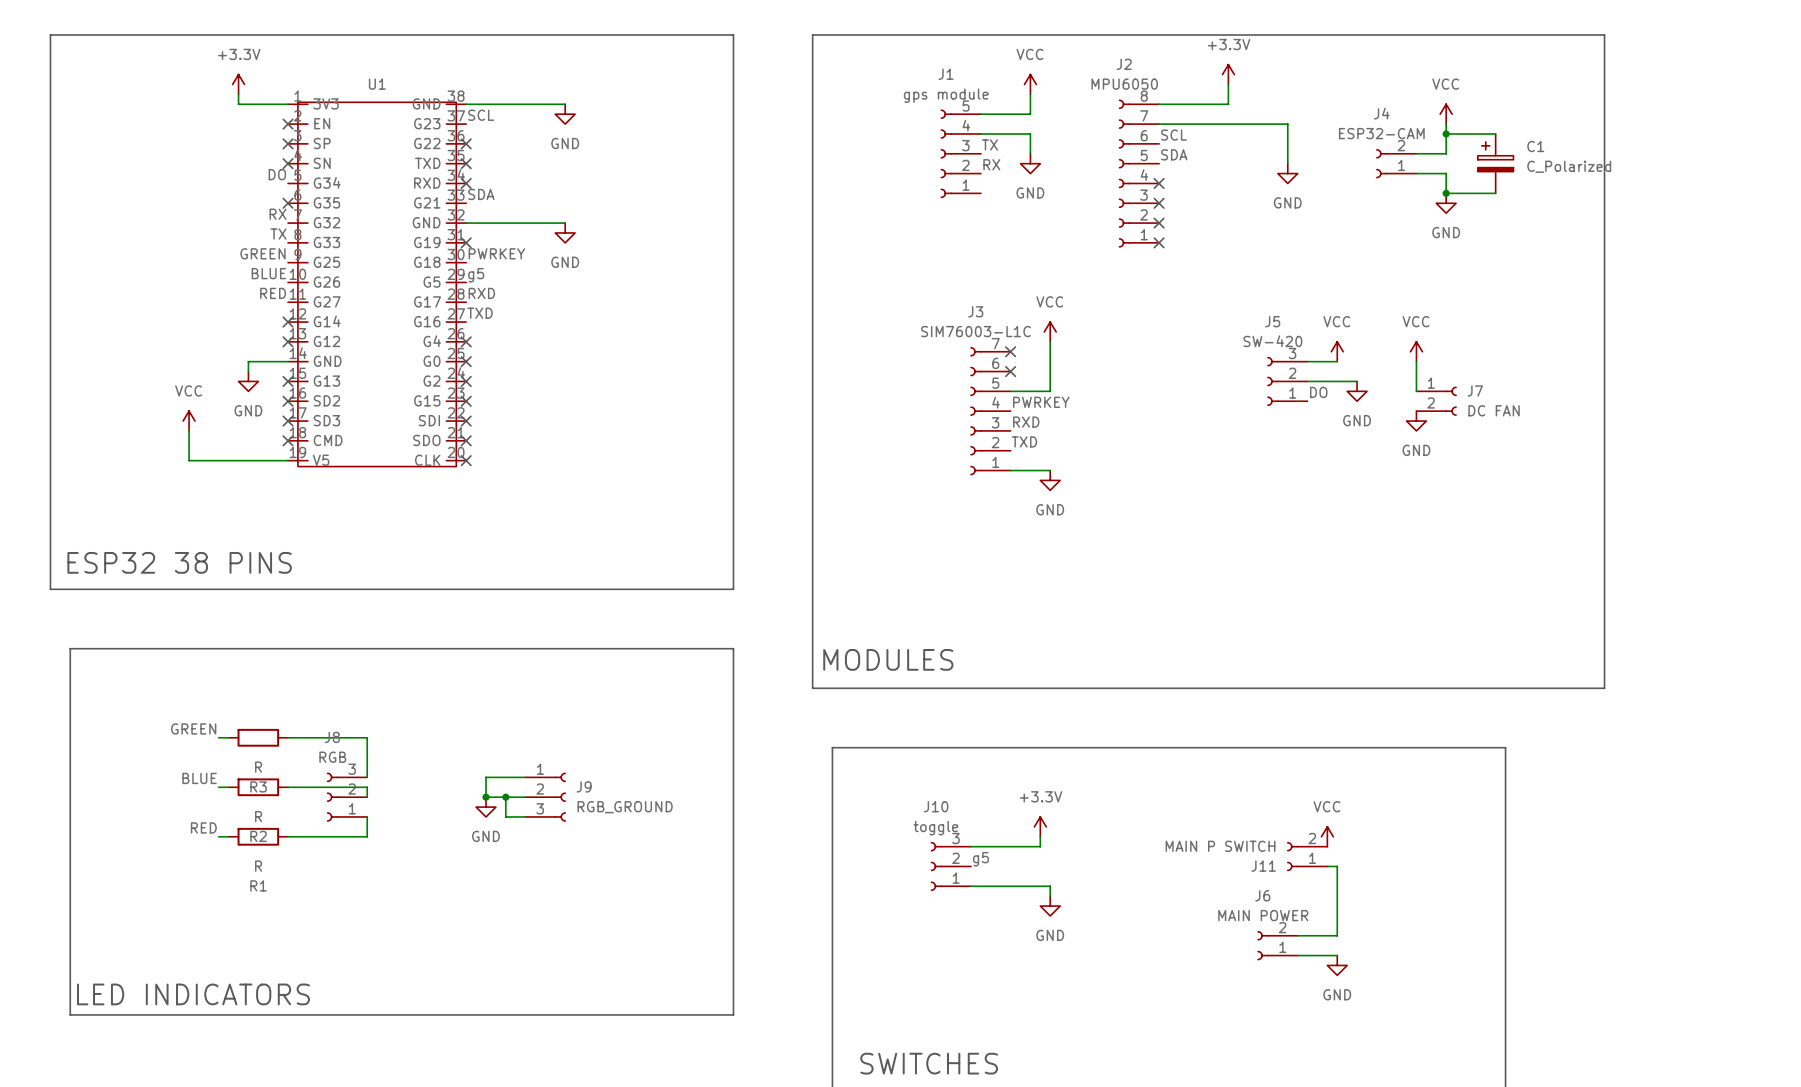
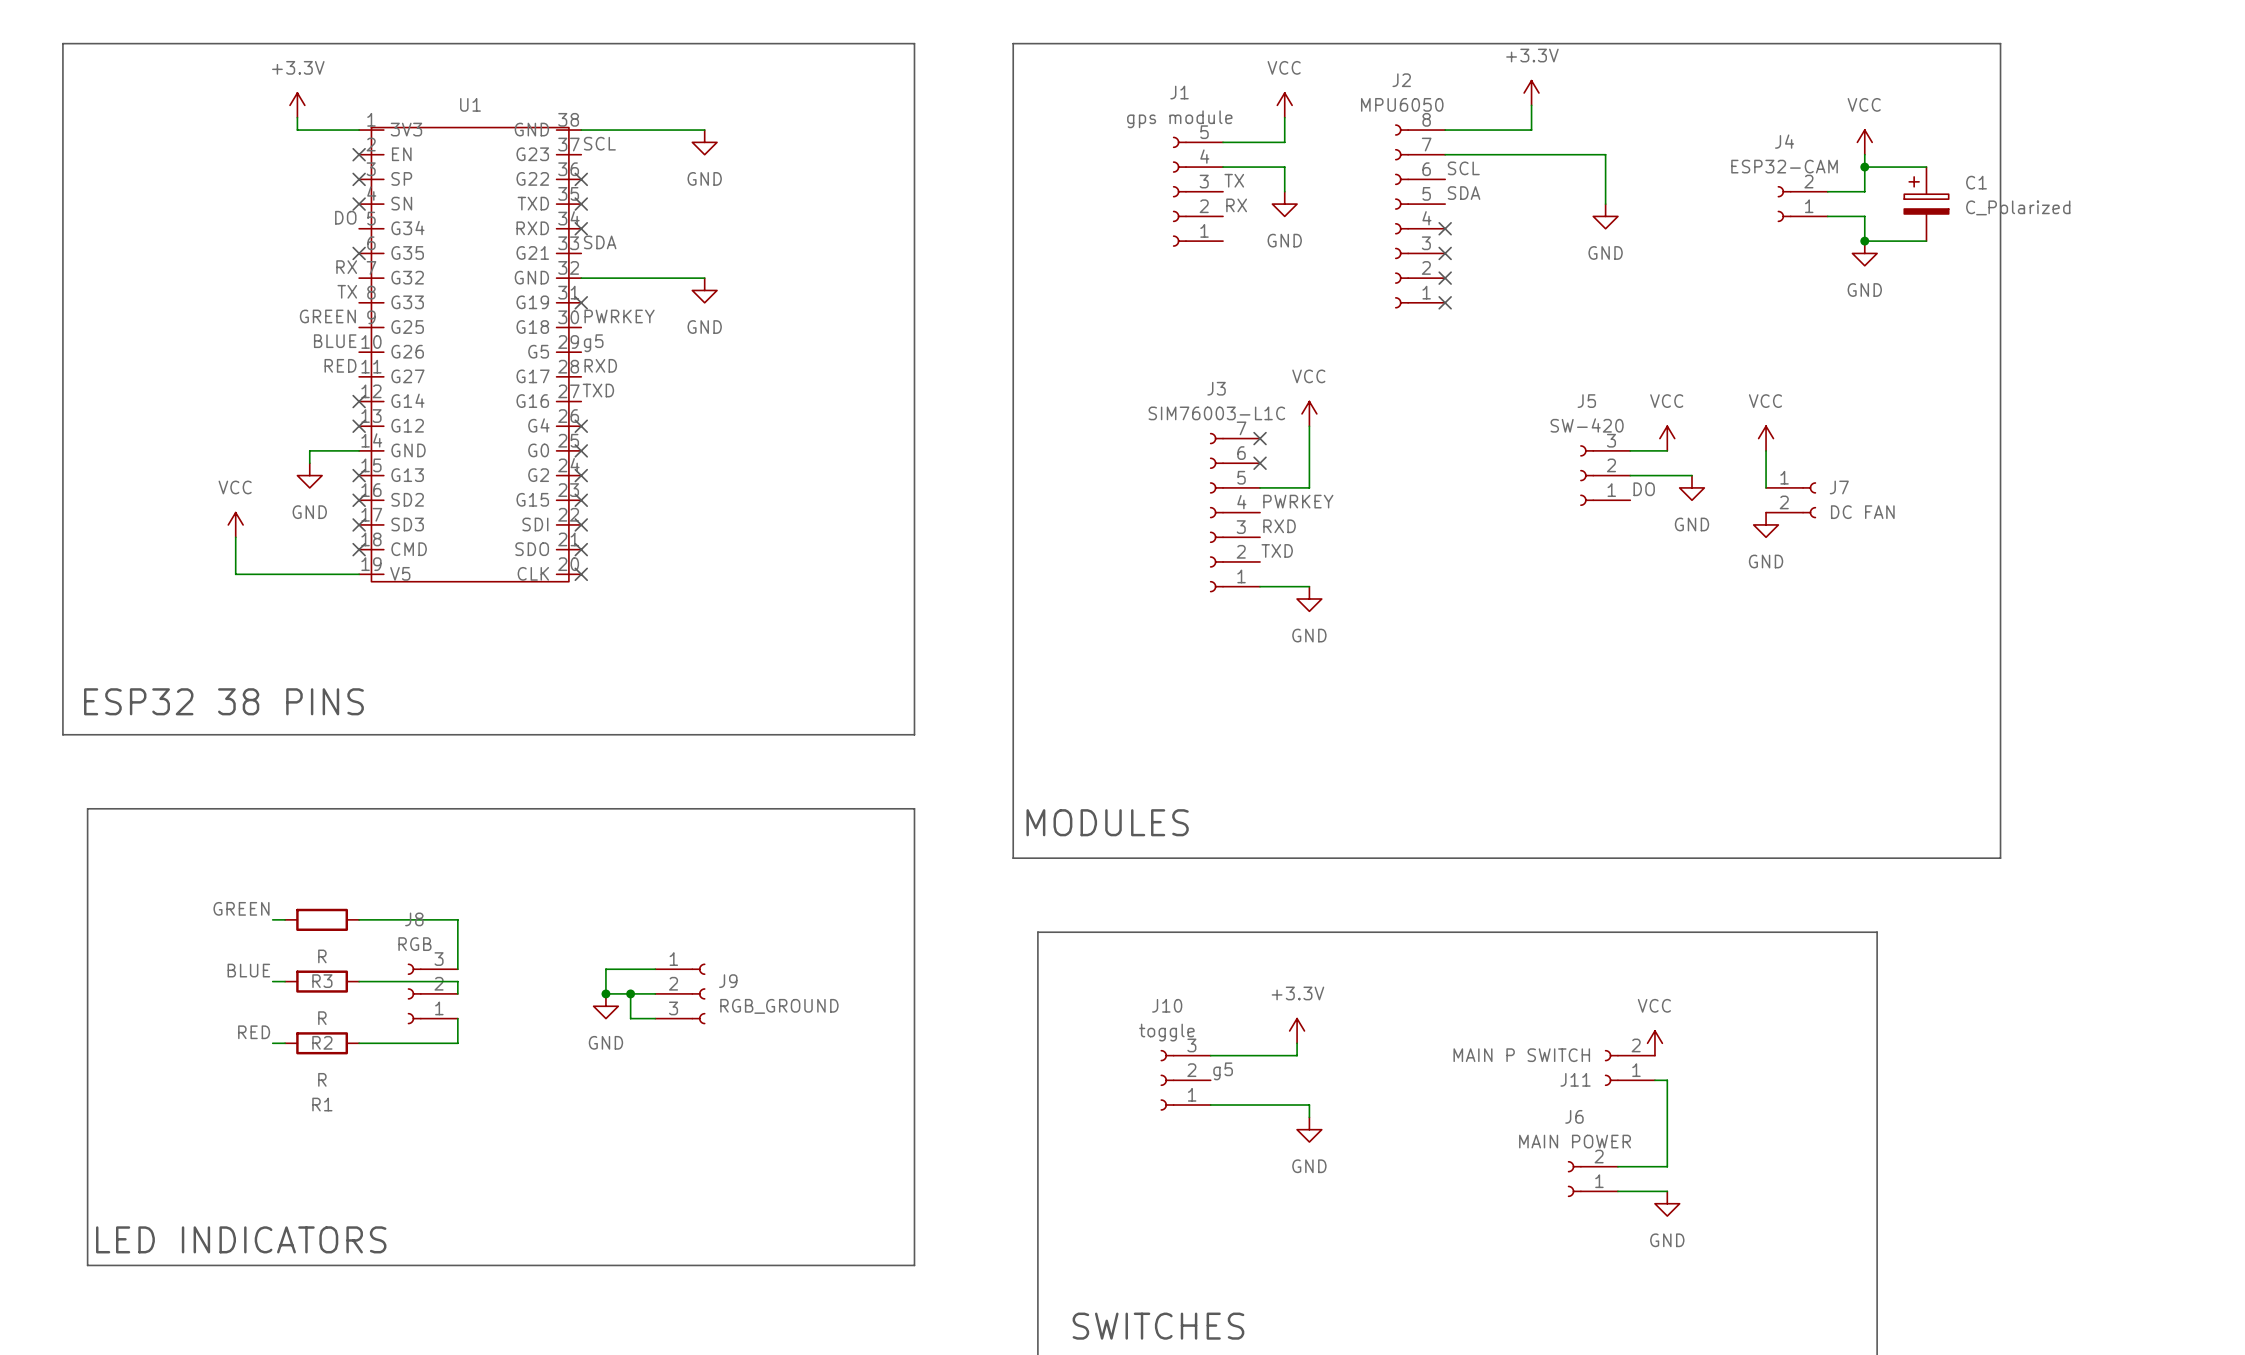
power symbol position: VCC (1446, 114) -> VCC (1864, 142)
wire: (1446, 124) (1446, 153) (1416, 153) -> (1864, 154) (1864, 191) (1827, 191)
wire: (1446, 133) (1495, 133) -> (1926, 167) (1864, 167)
junction: (1446, 133) -> none
junction: none -> (1864, 167)
J4 position: (1396, 163) -> (1802, 204)
C1 position: (1495, 163) -> (1926, 204)
wire: (1416, 173) (1446, 173) (1446, 193) (1495, 193) -> (1827, 216) (1864, 216) (1864, 241) (1926, 241)
junction: (1446, 193) -> none
junction: none -> (1864, 241)
power symbol position: GND (1446, 203) -> GND (1864, 253)

